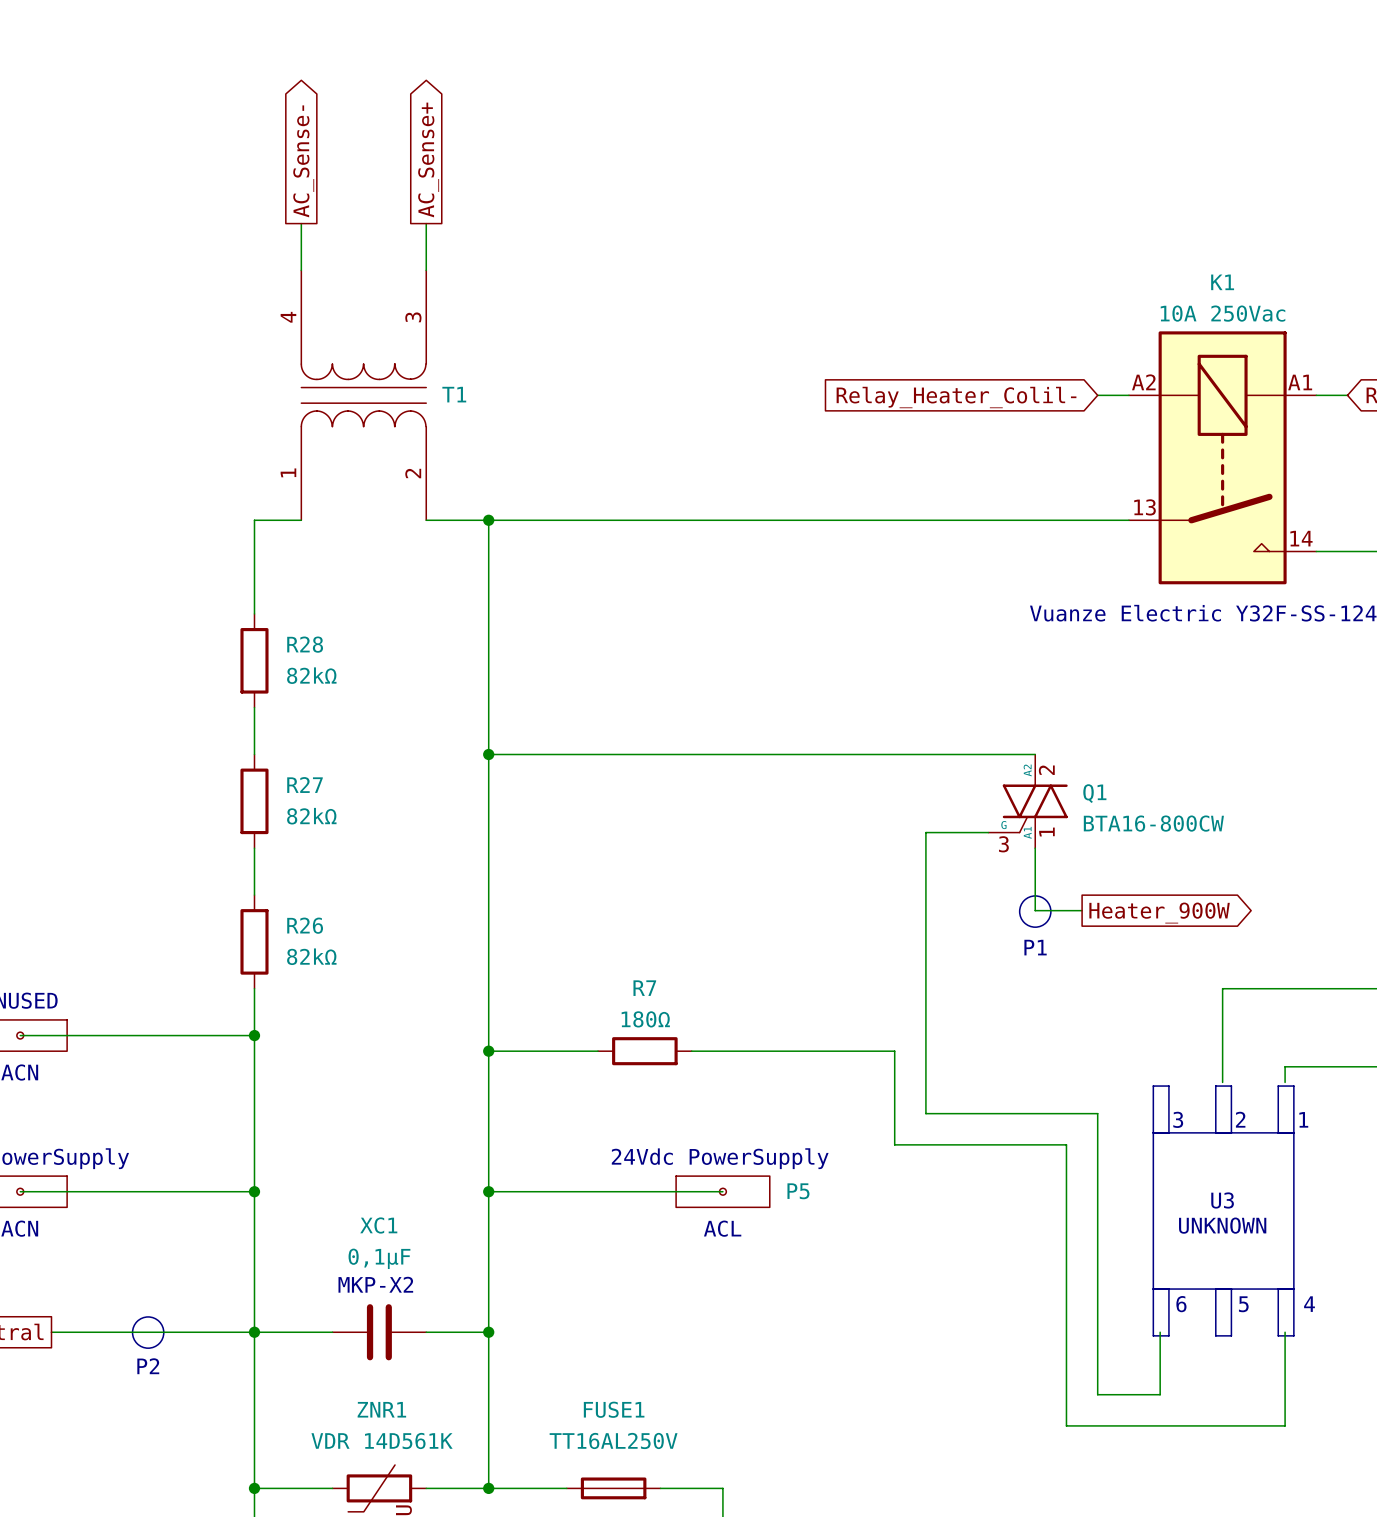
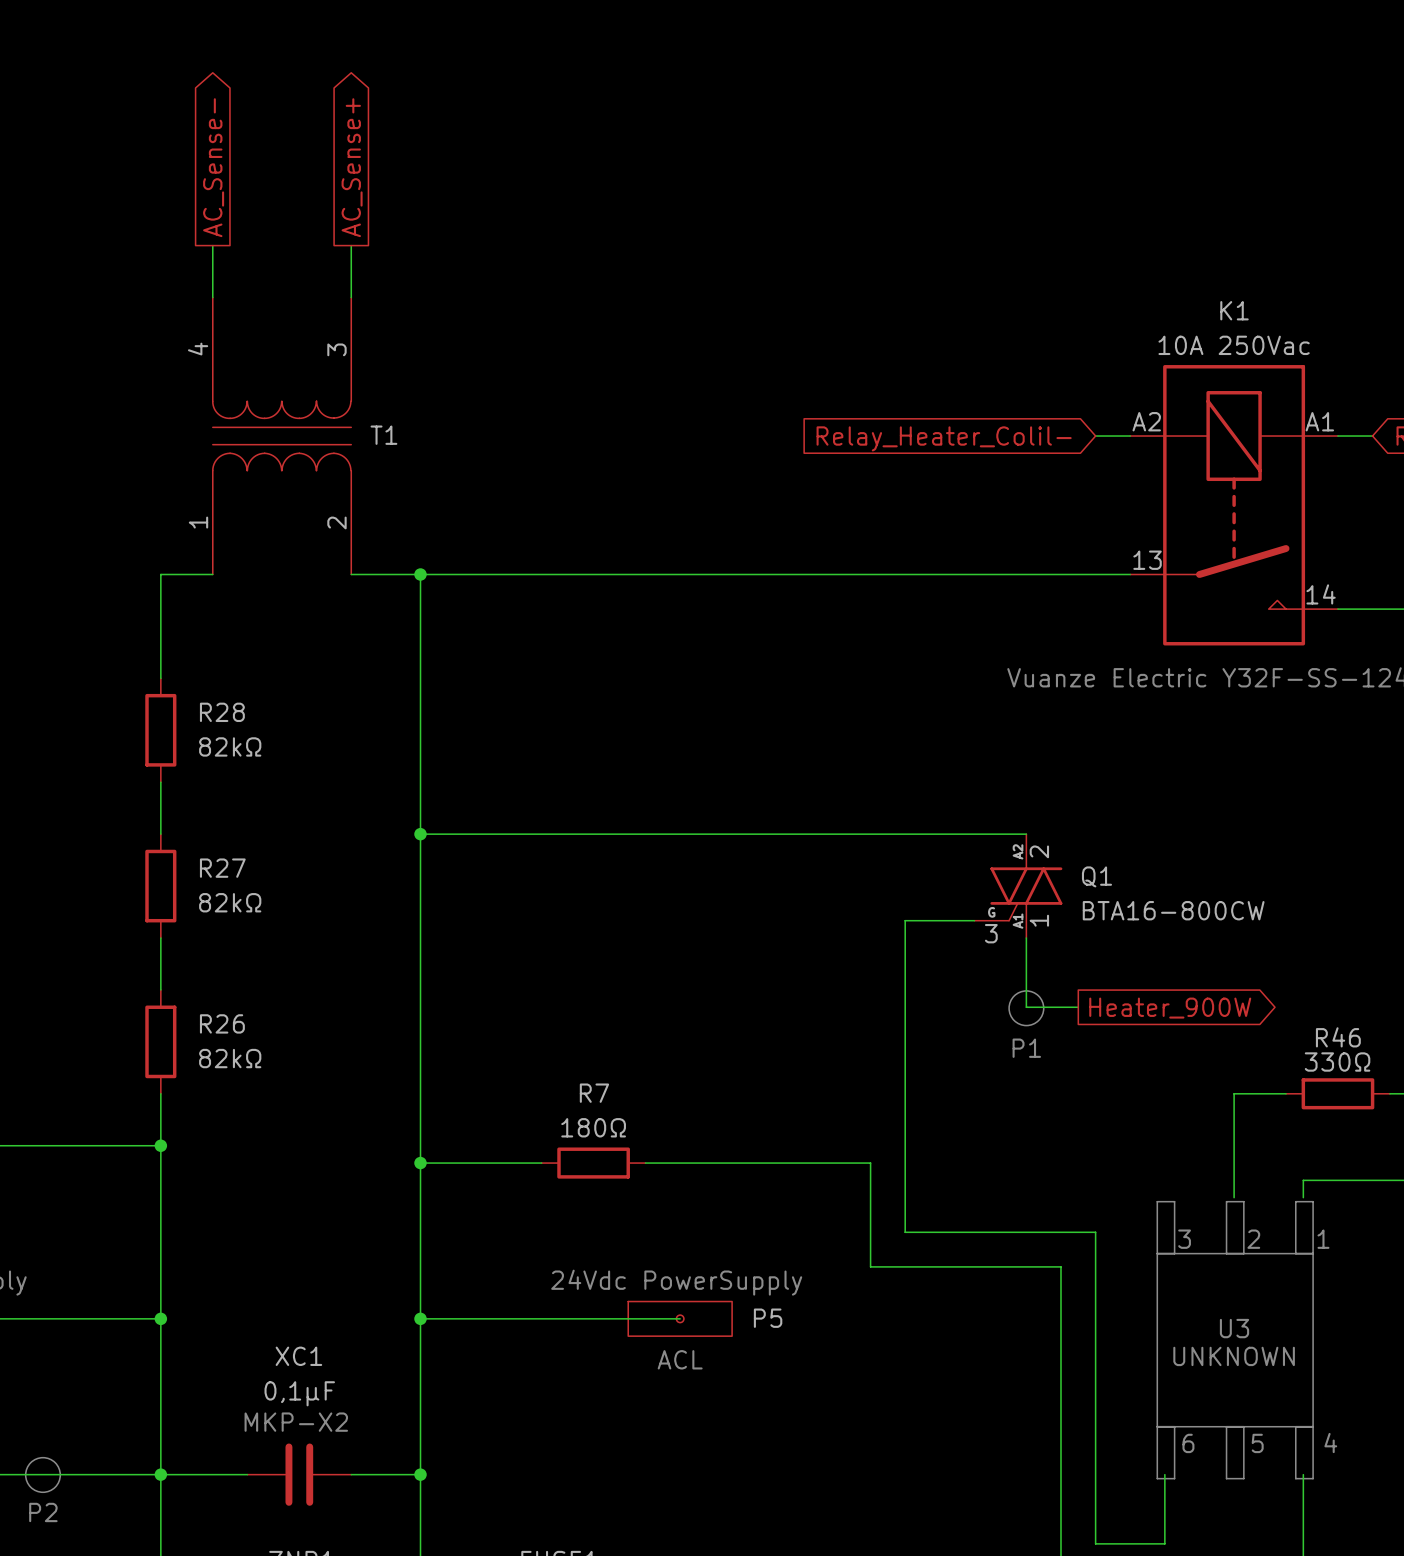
wire: (1269, 988) (1363, 988) -> none
R46: none -> 330Ω (1337, 1093)

